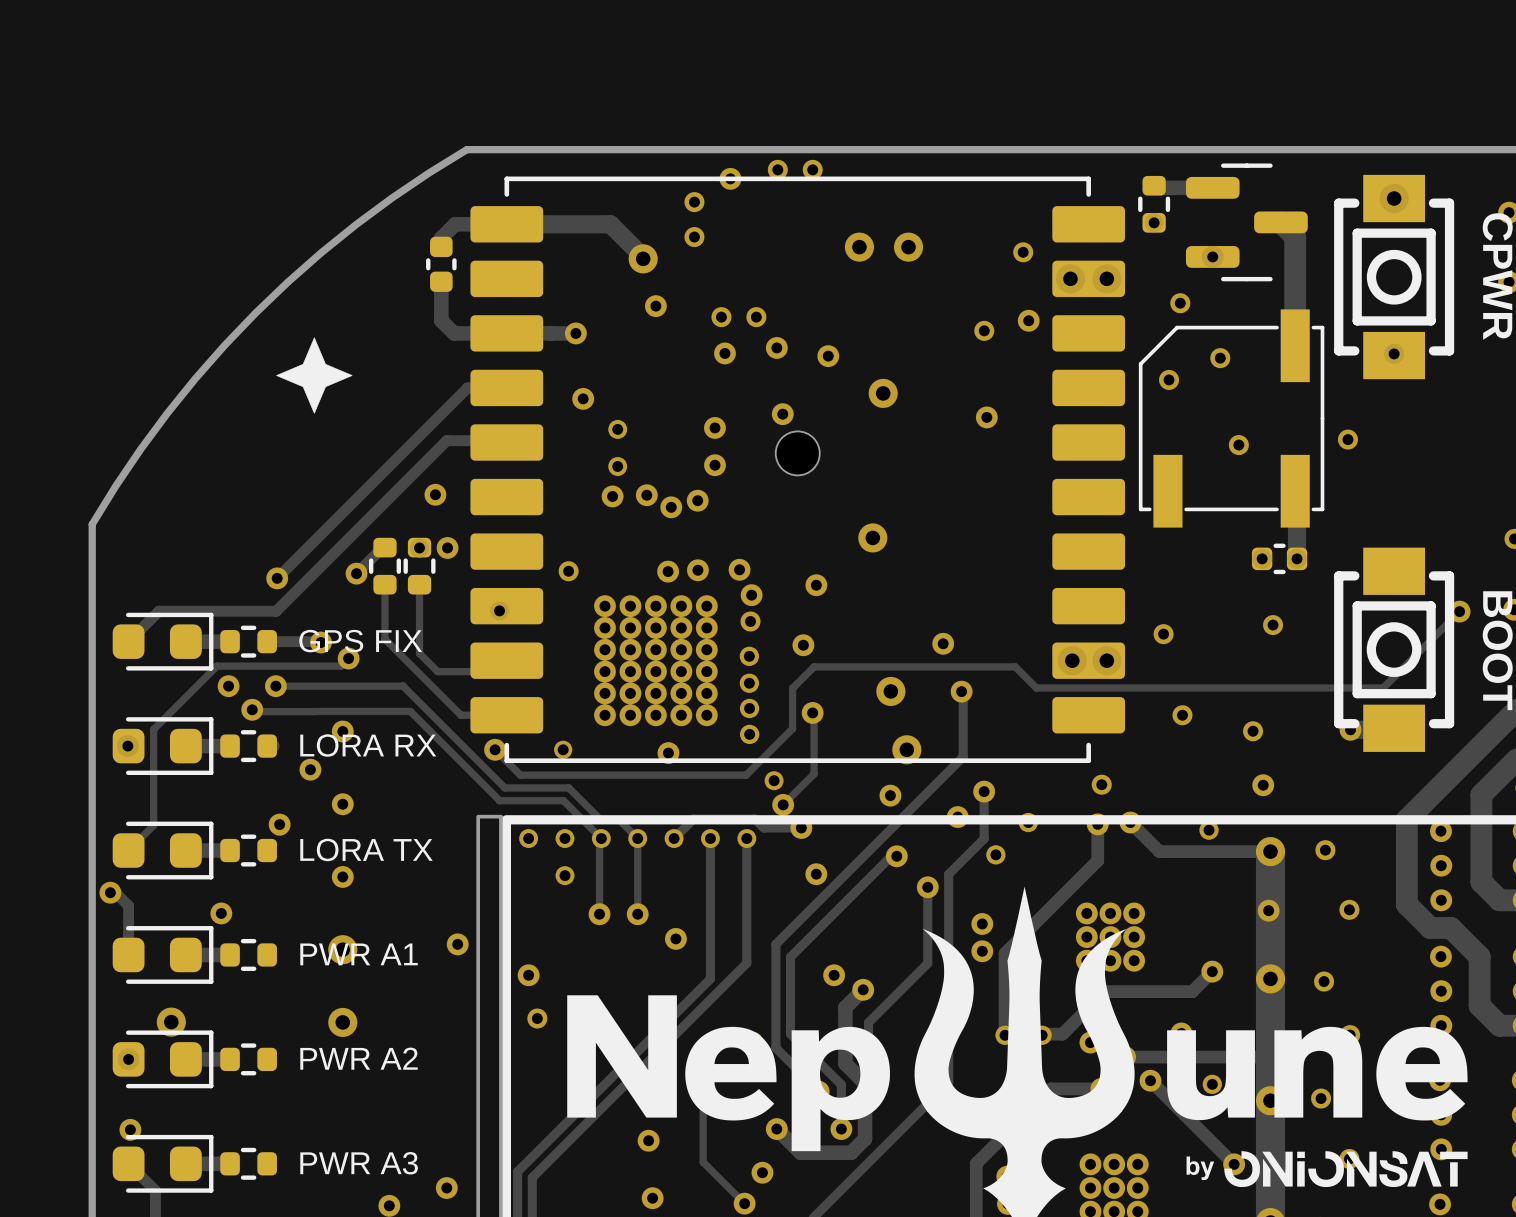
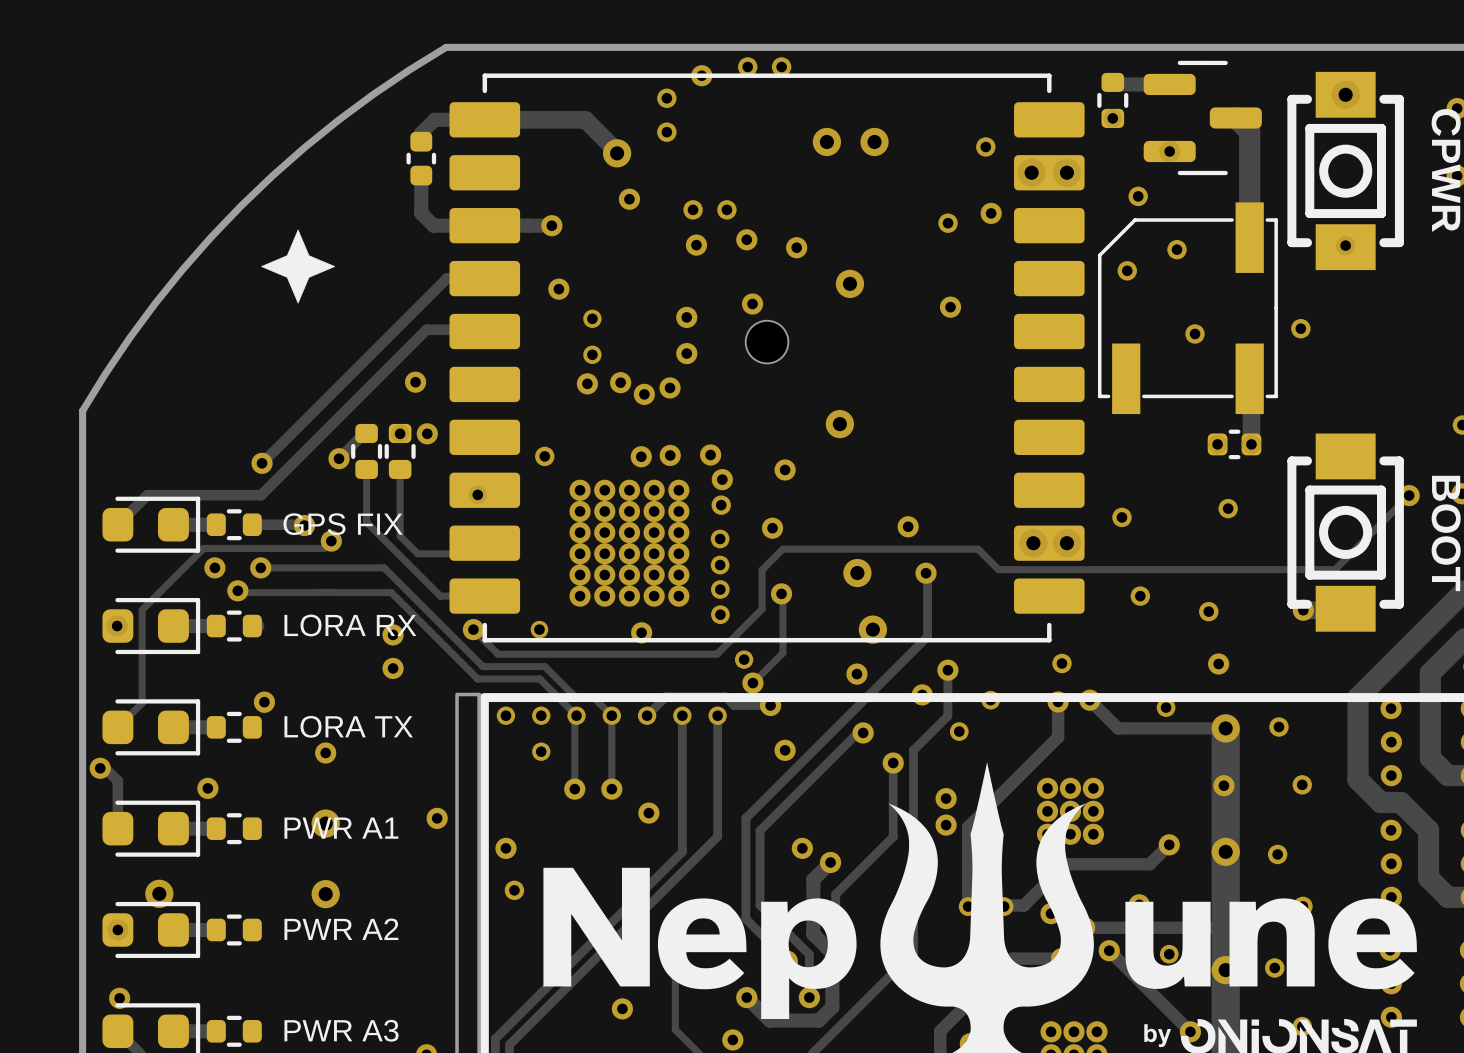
via: (342, 731) -> none
via: none -> (393, 634)
via: (310, 769) -> none
via: none -> (393, 668)
via: (342, 804) -> none

